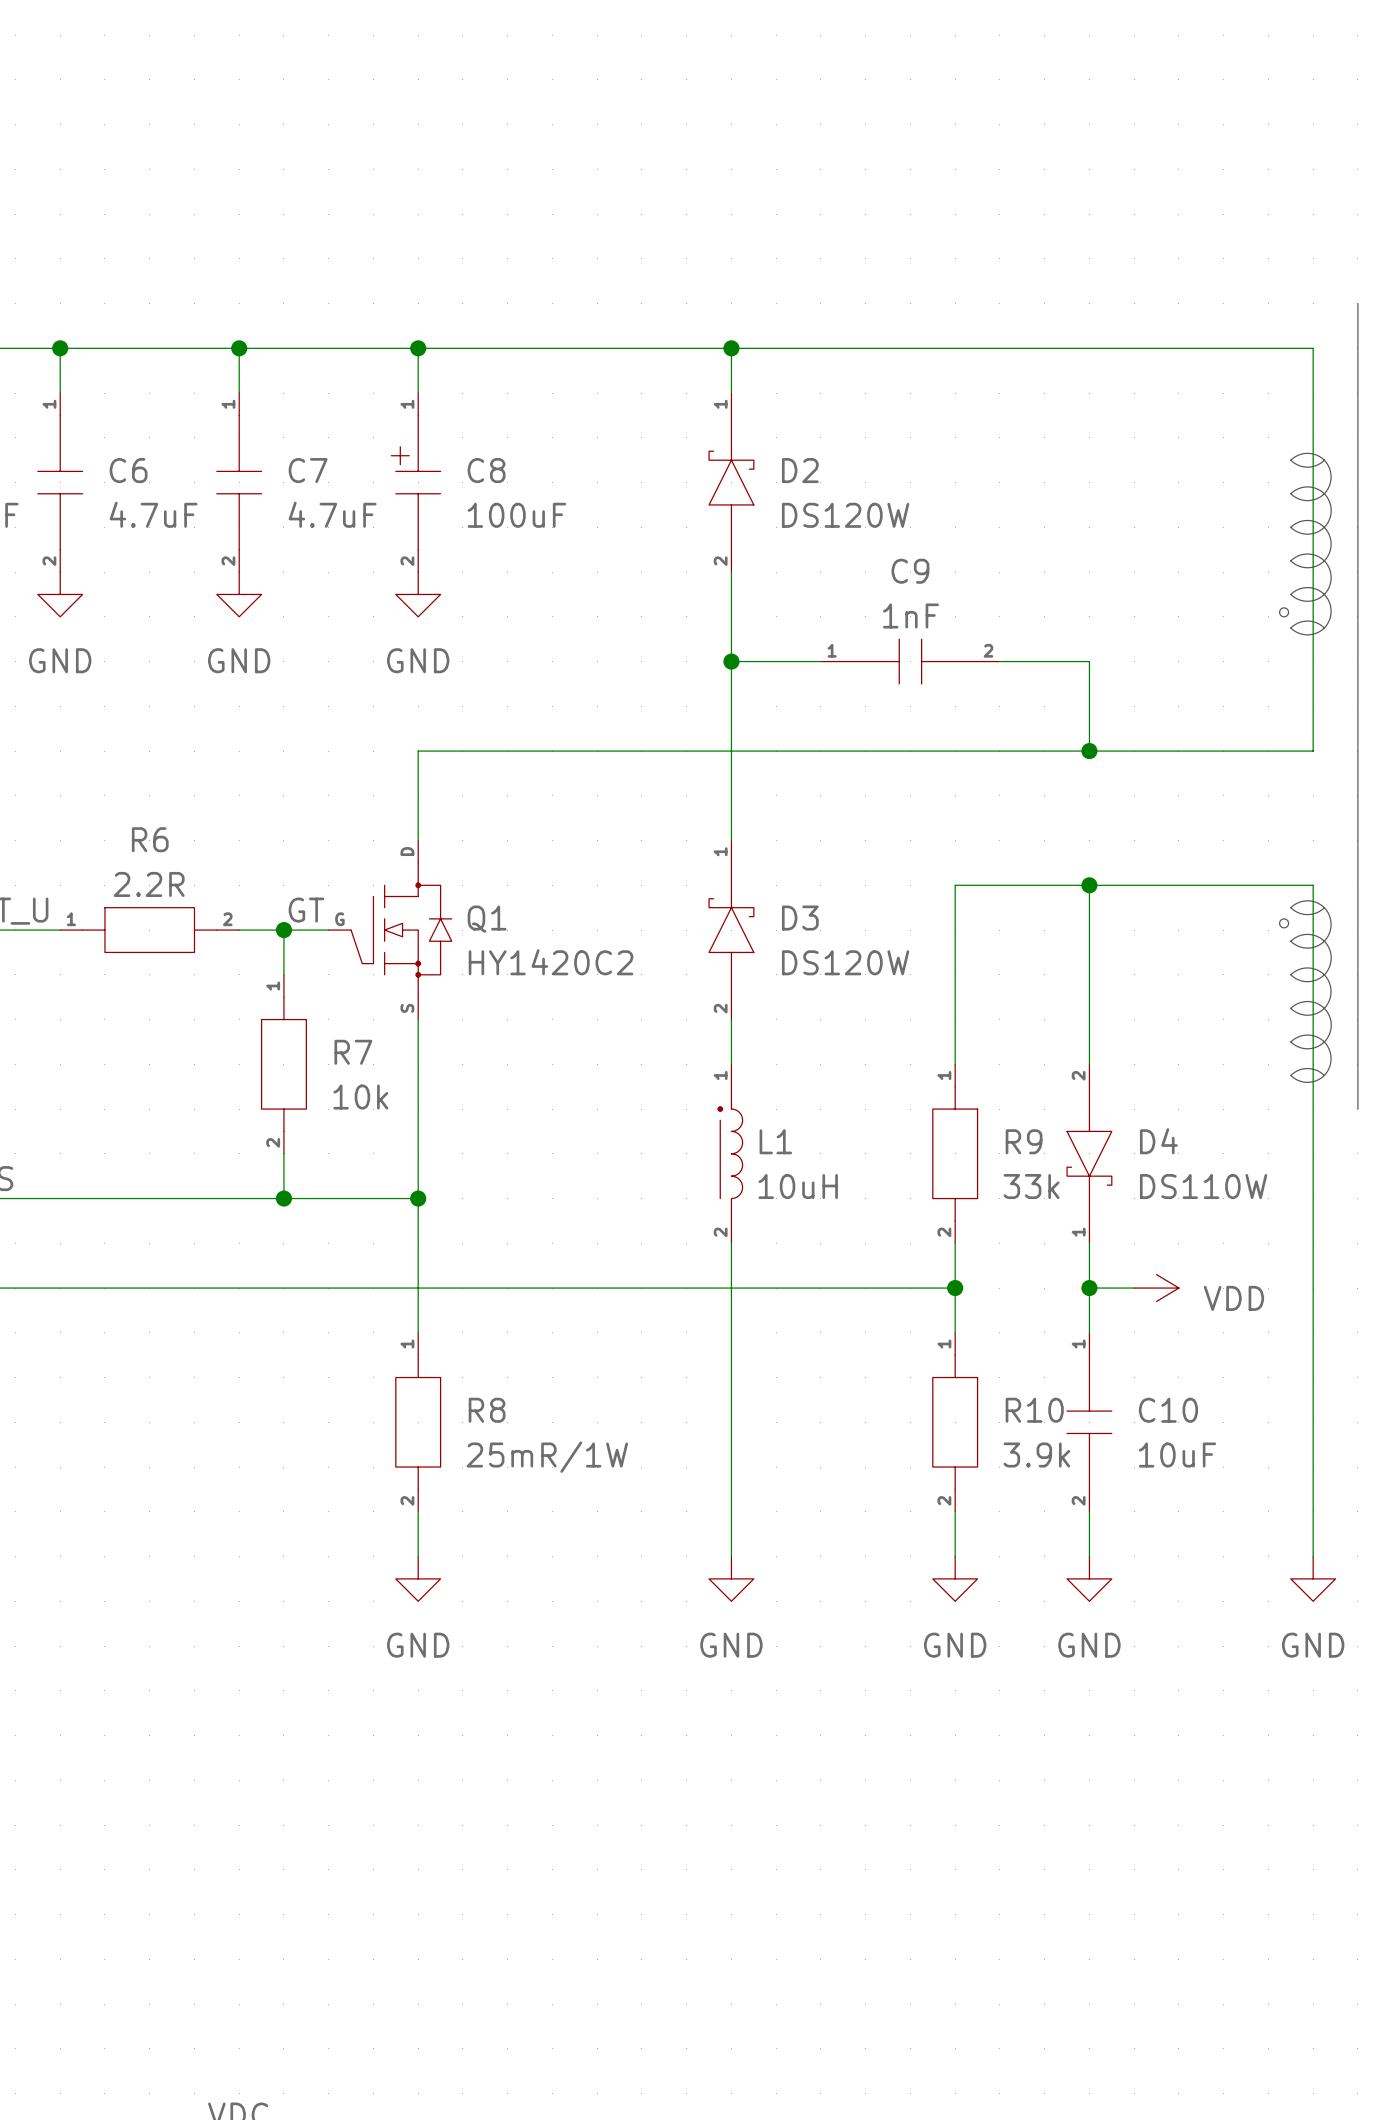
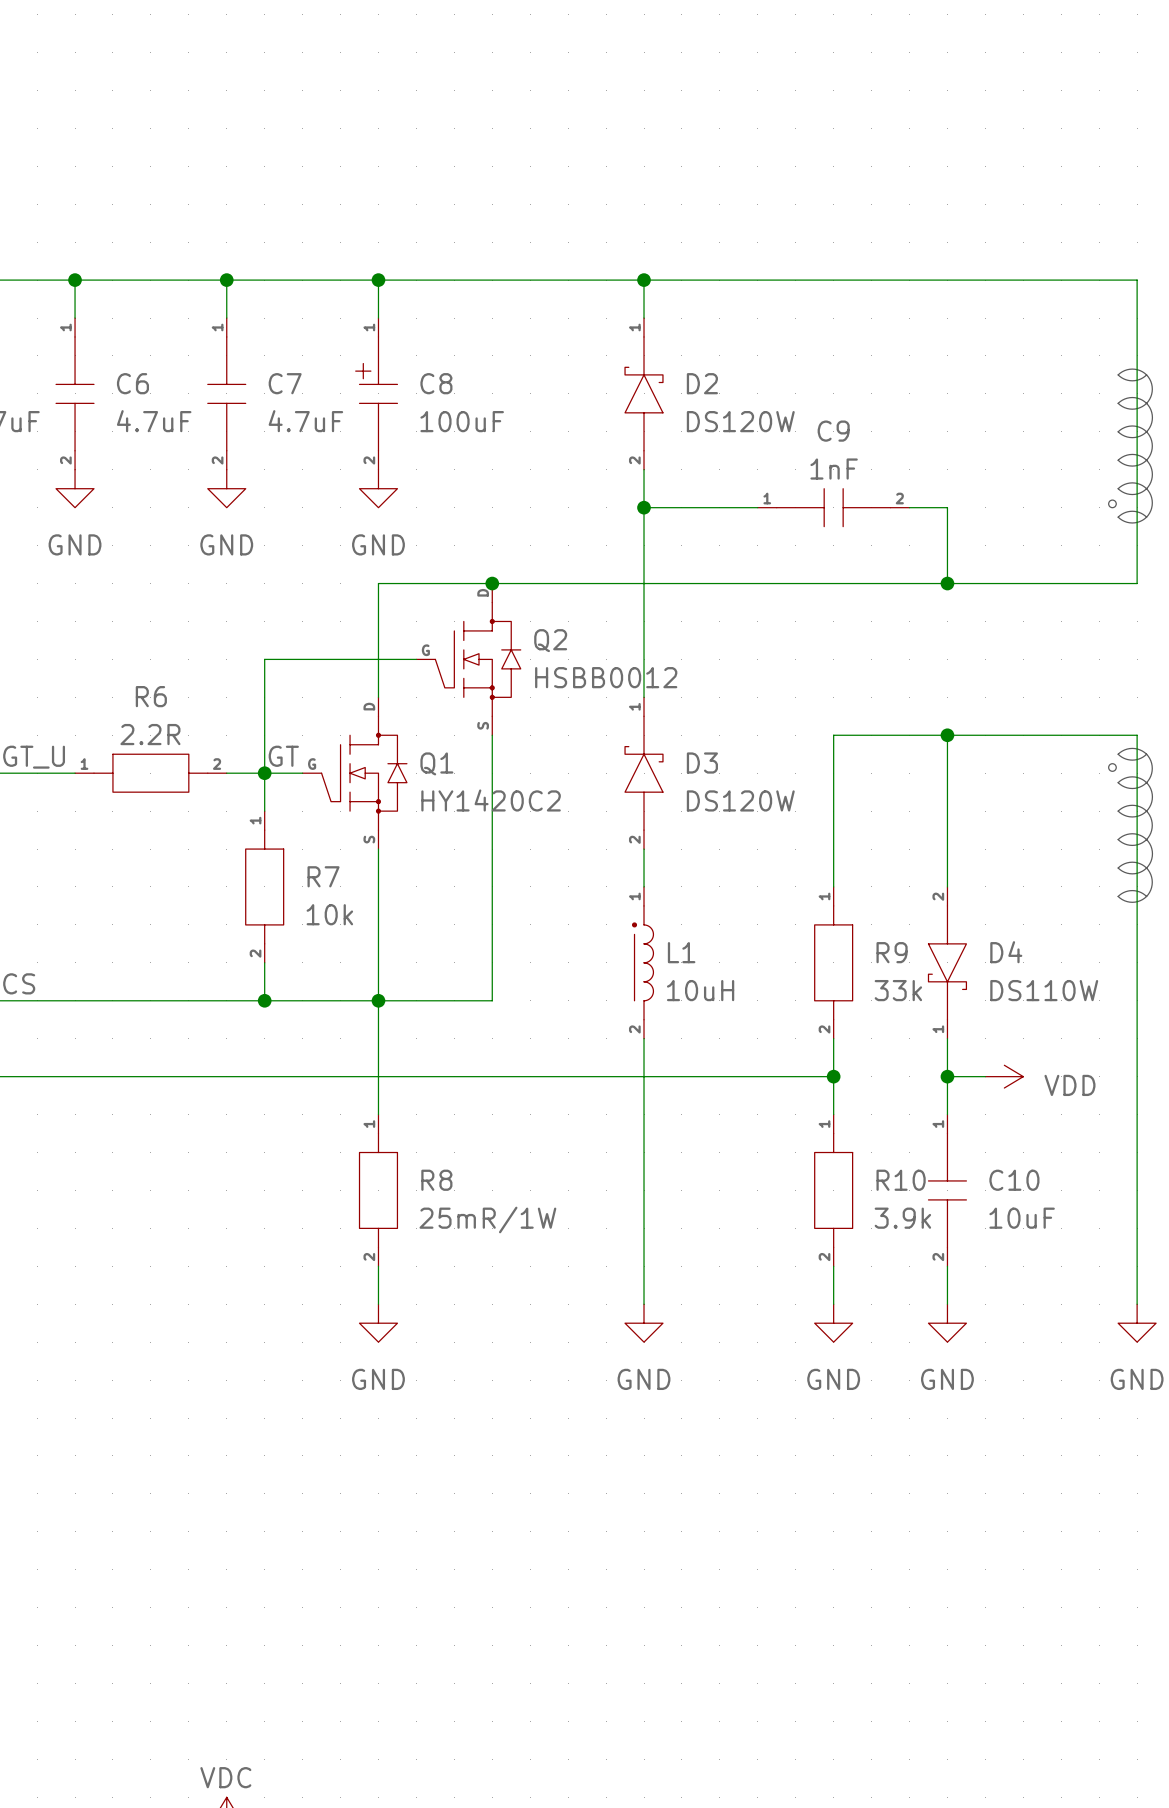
wire: none -> (644, 507) (757, 507)
wire: (731, 661) (820, 661) -> none
junction position: (731, 661) -> (644, 507)
C9 position: (910, 661) -> (833, 507)
wire: (999, 661) (1089, 661) -> (909, 507) (947, 507) (947, 545)
junction: none -> (492, 583)
wire: (1089, 706) (1089, 751) -> none
wire: (1313, 706) (1313, 751) (418, 751) -> (1137, 583) (378, 583) (378, 621)
junction position: (1089, 751) -> (947, 583)
wire: none -> (416, 659) (264, 659) (264, 773)
Q2: none -> HSBB0012 (468, 659)
wire: none -> (492, 735) (492, 1000) (378, 1000)

